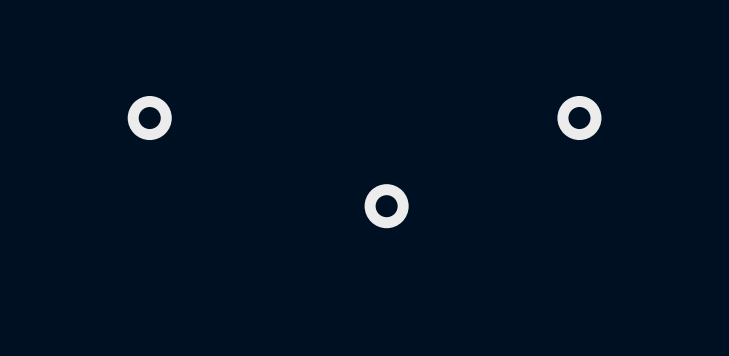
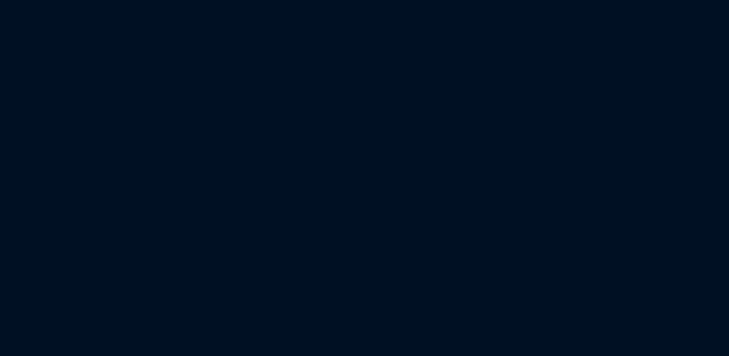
via: (149, 118) -> none
via: (579, 118) -> none
via: (386, 206) -> none

